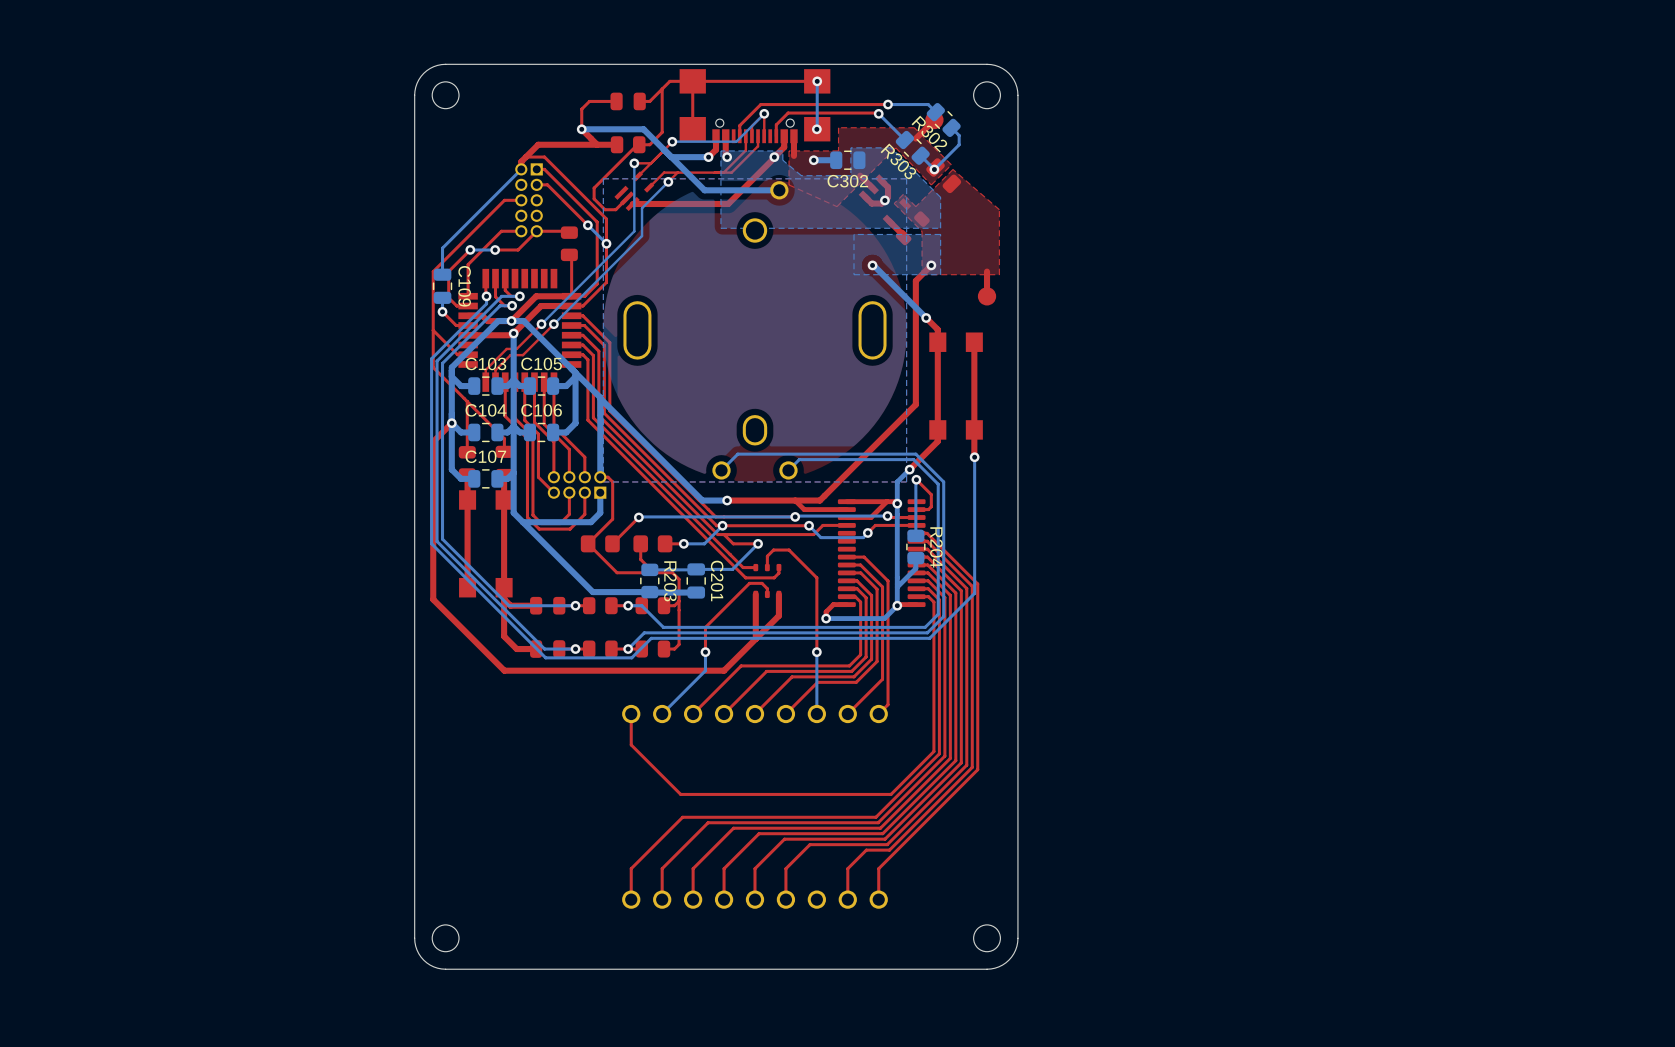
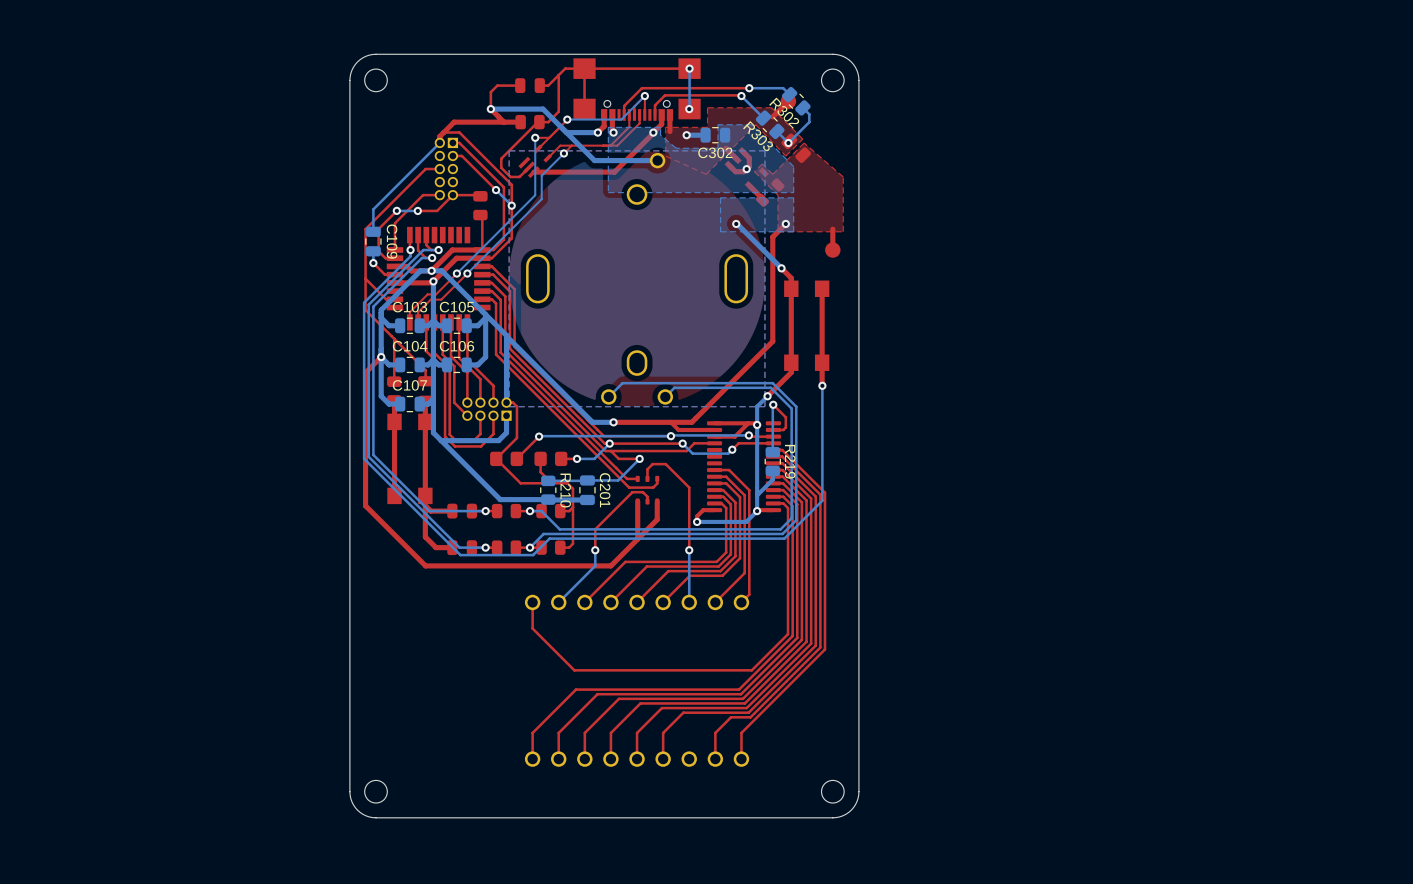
R204 name: R204 (936, 547) -> R219 (790, 461)
R203 name: R203 (670, 581) -> R210 (565, 490)

